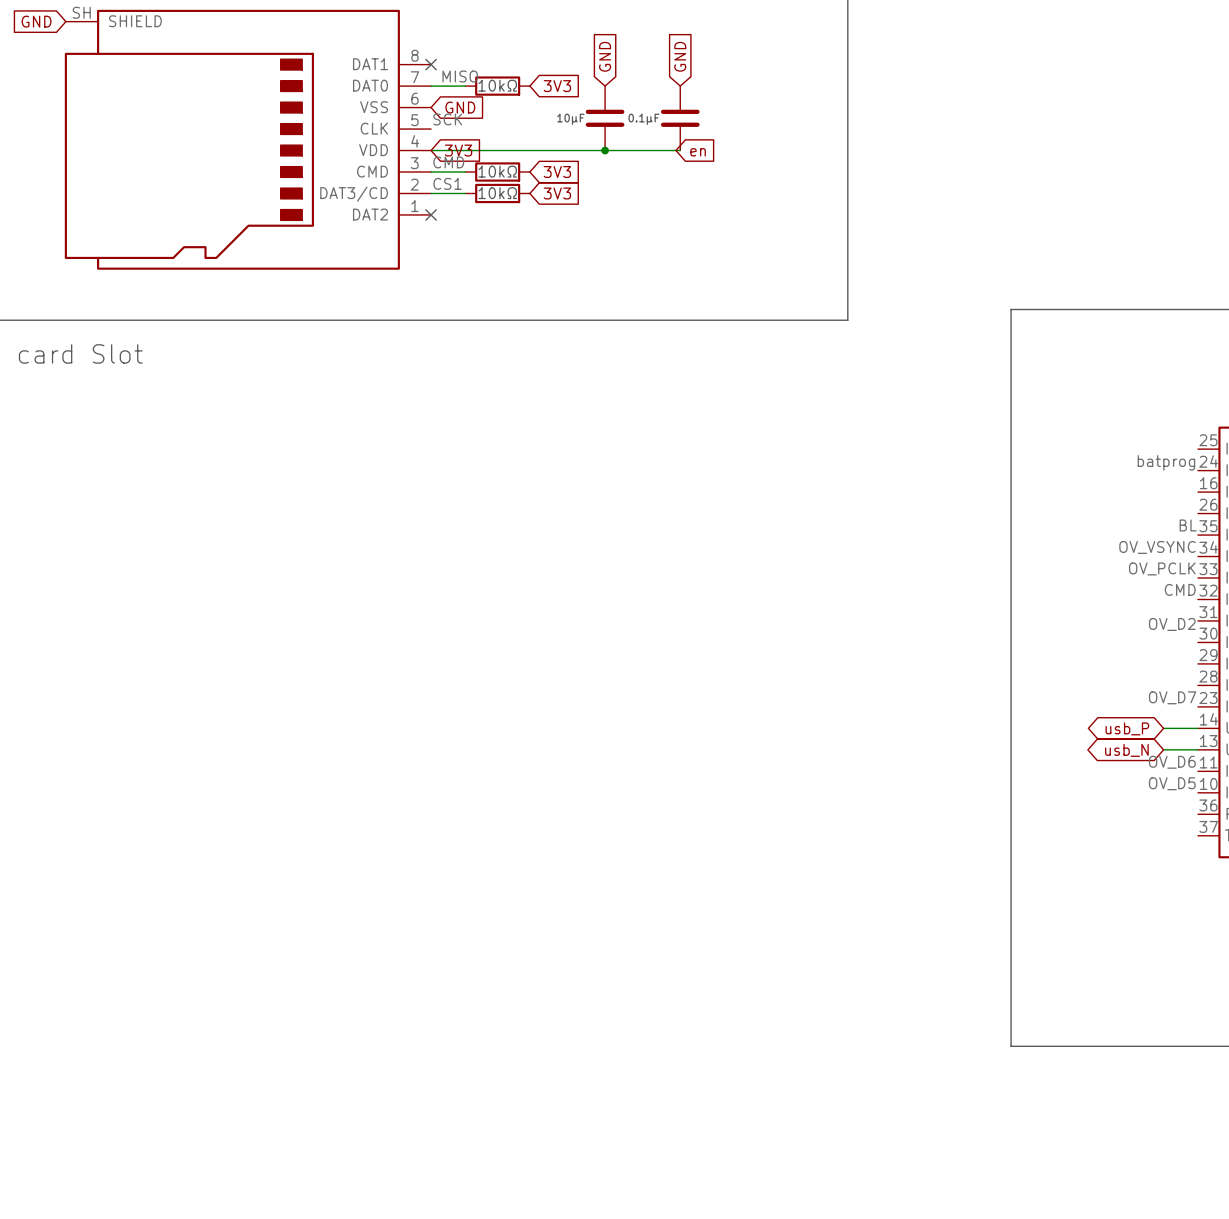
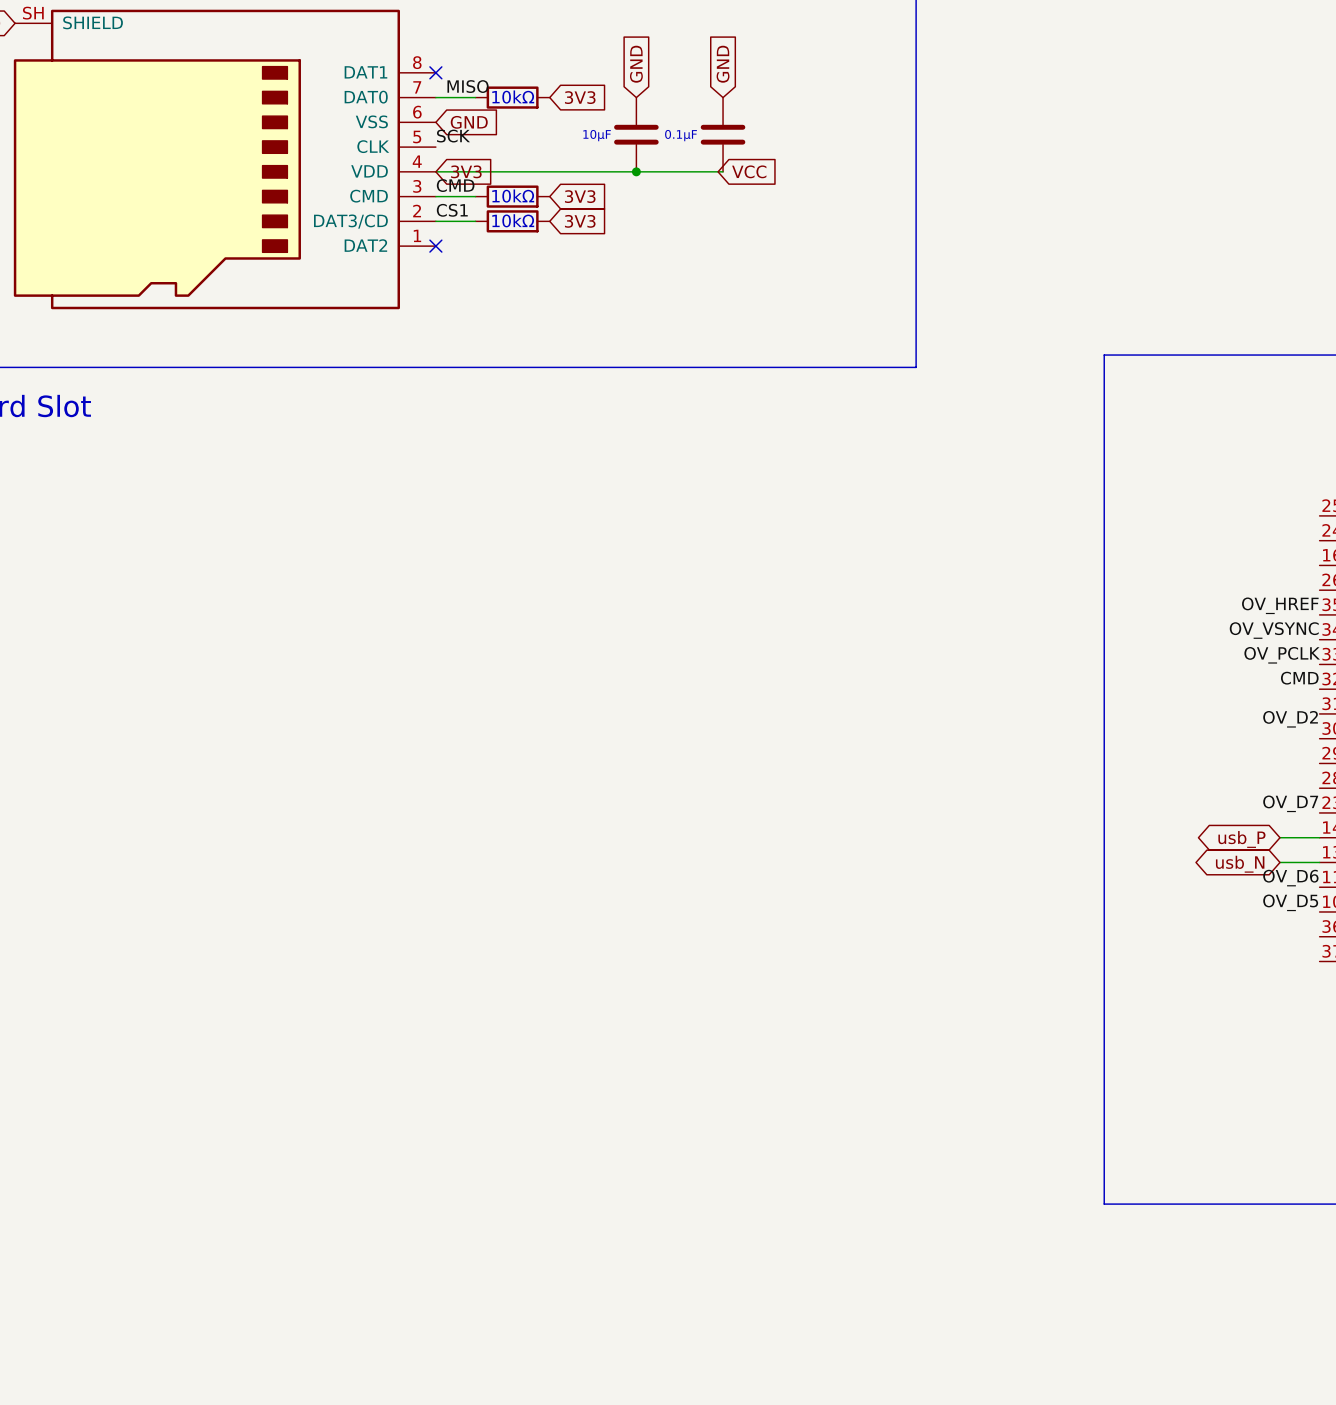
global label: en (698, 152) -> VCC (749, 171)
label: batprog (1166, 462) -> none
label: BL (1188, 525) -> OV_HREF (1280, 605)

